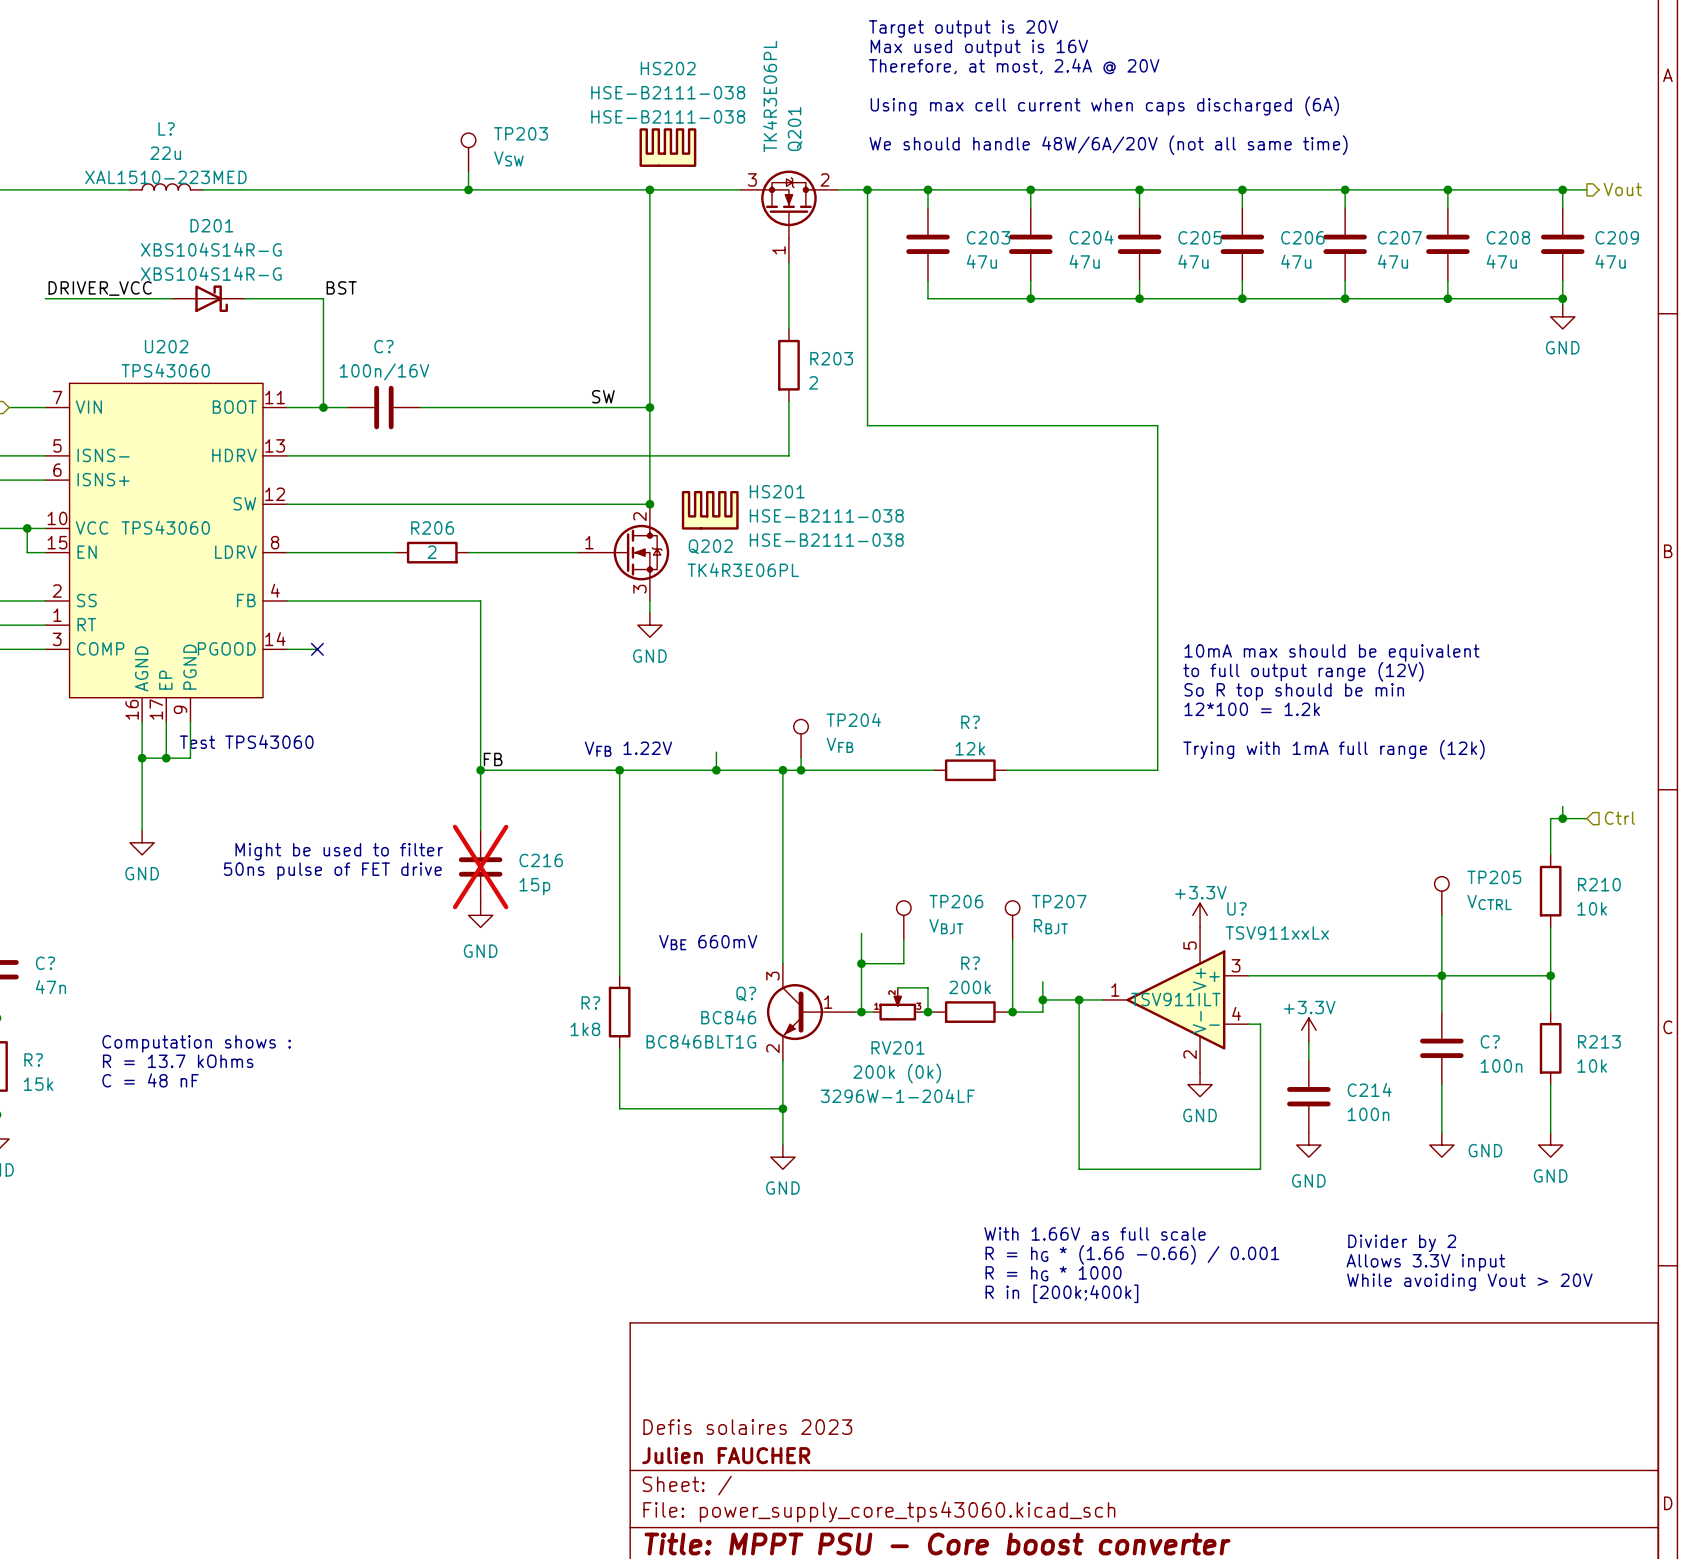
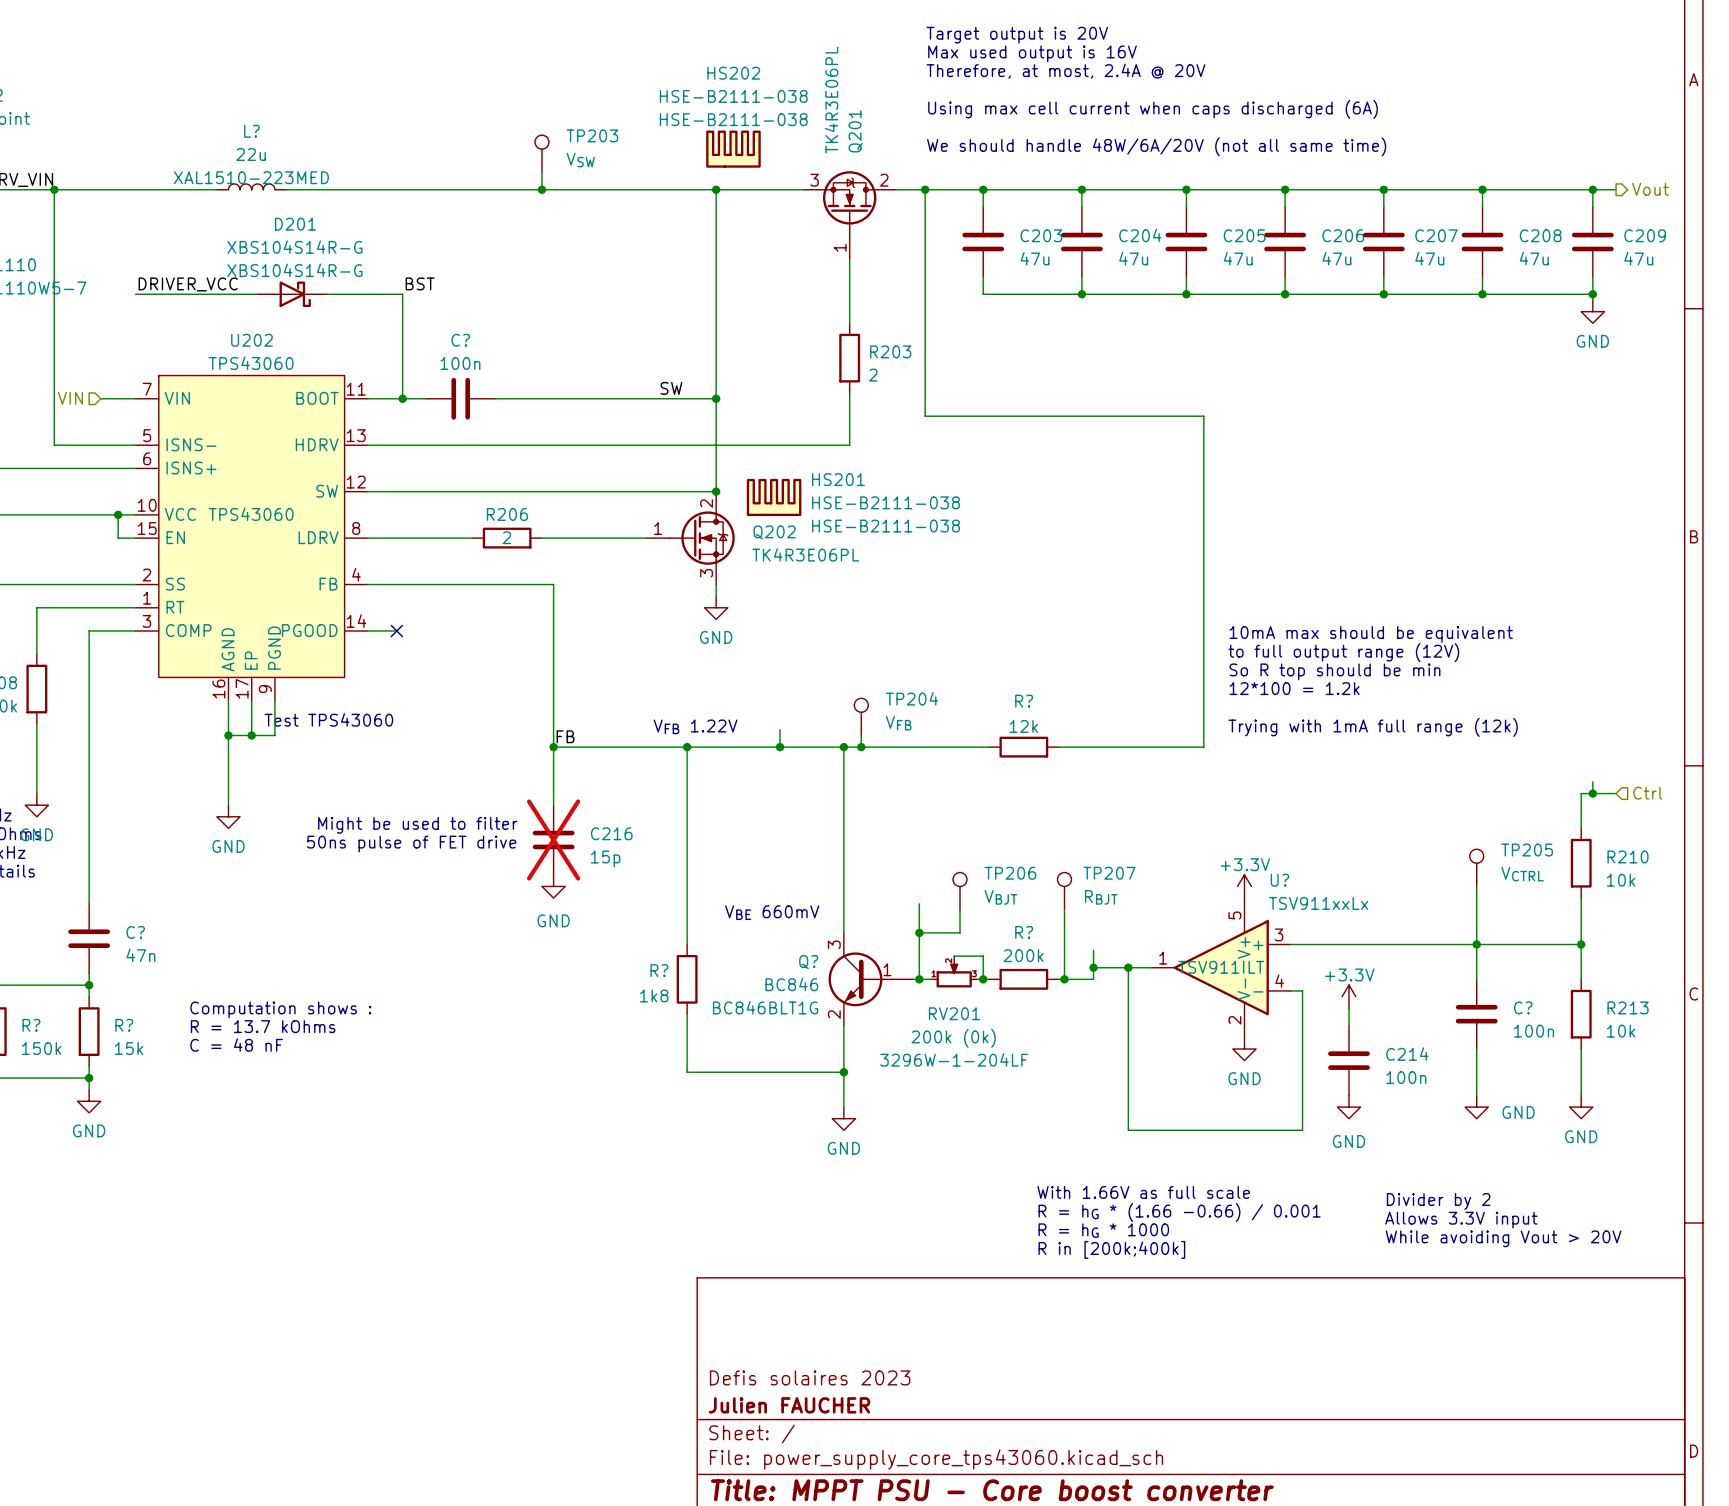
C? value: 100n/16V (384, 371) -> 100n (460, 363)

